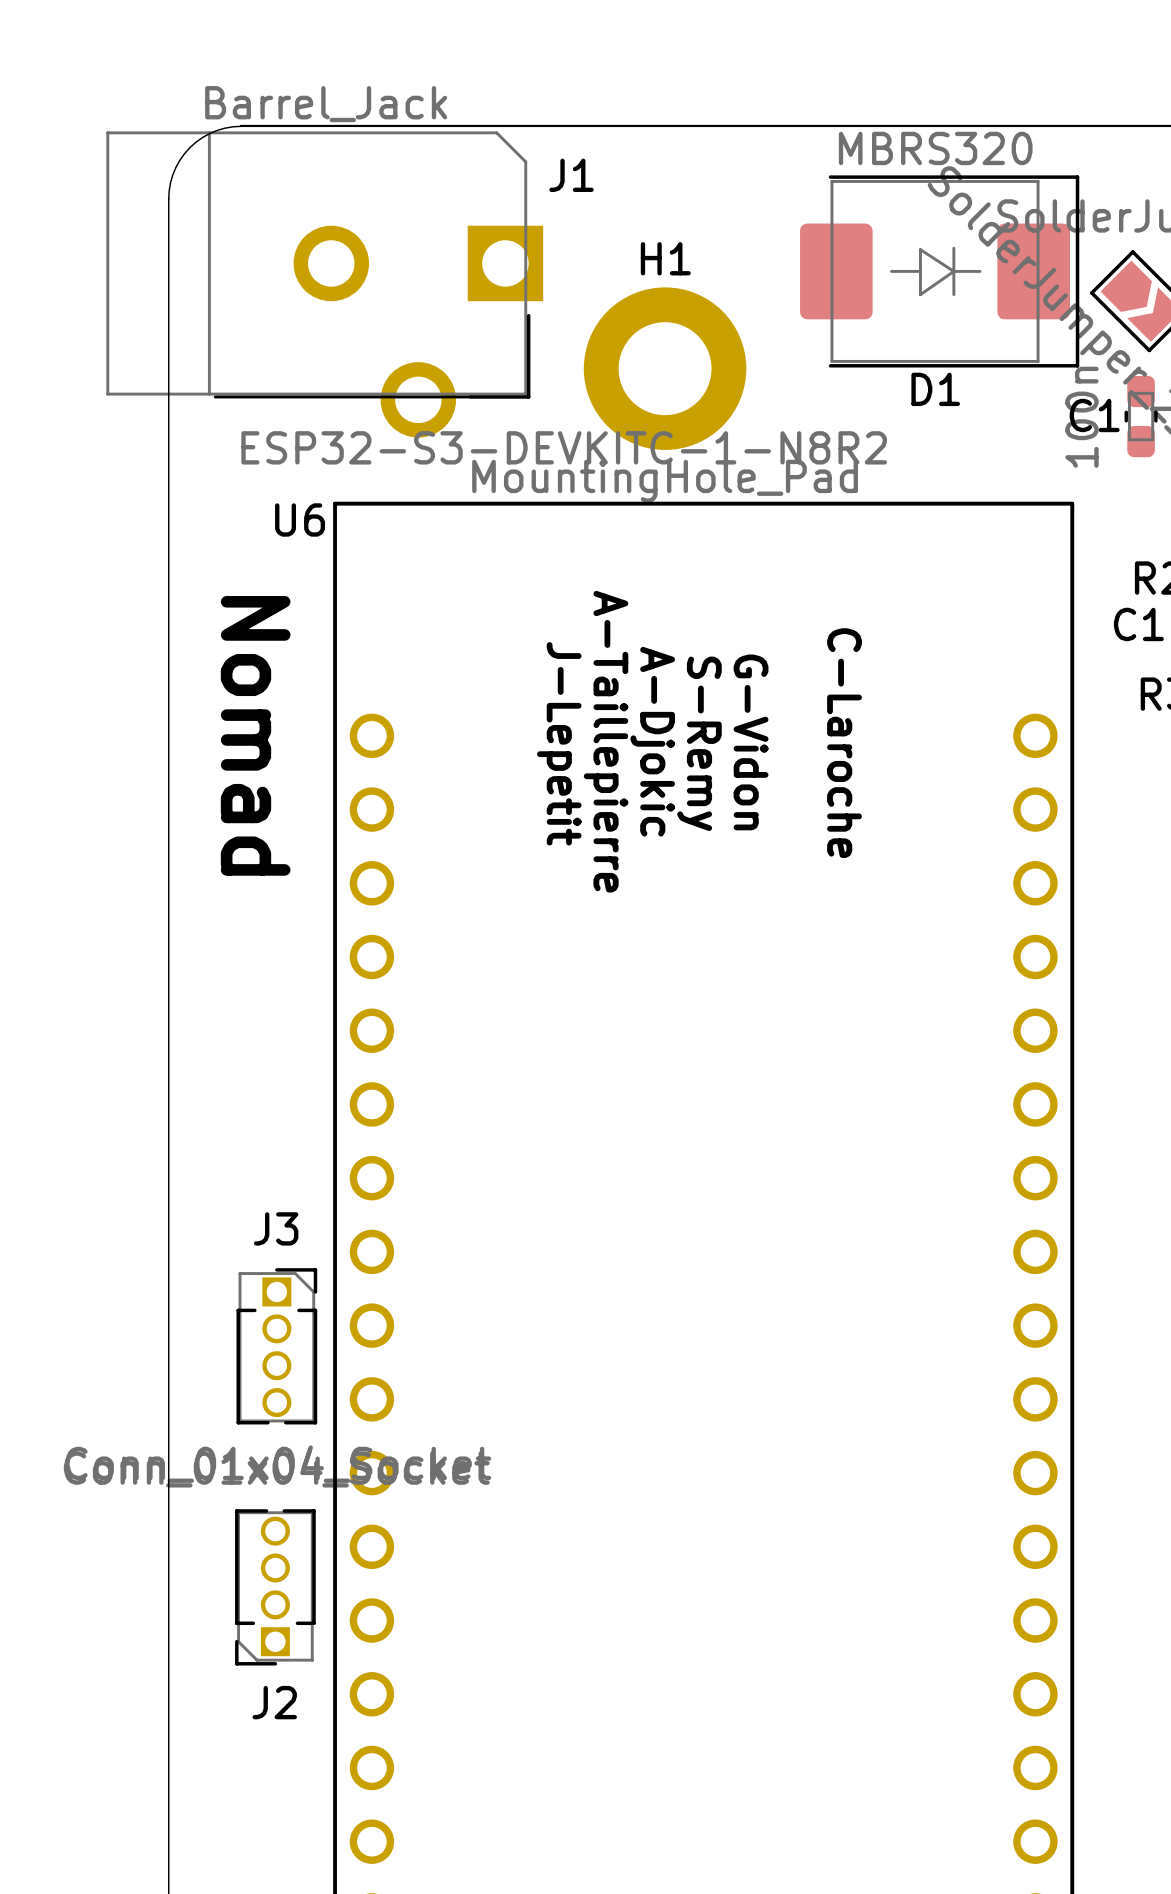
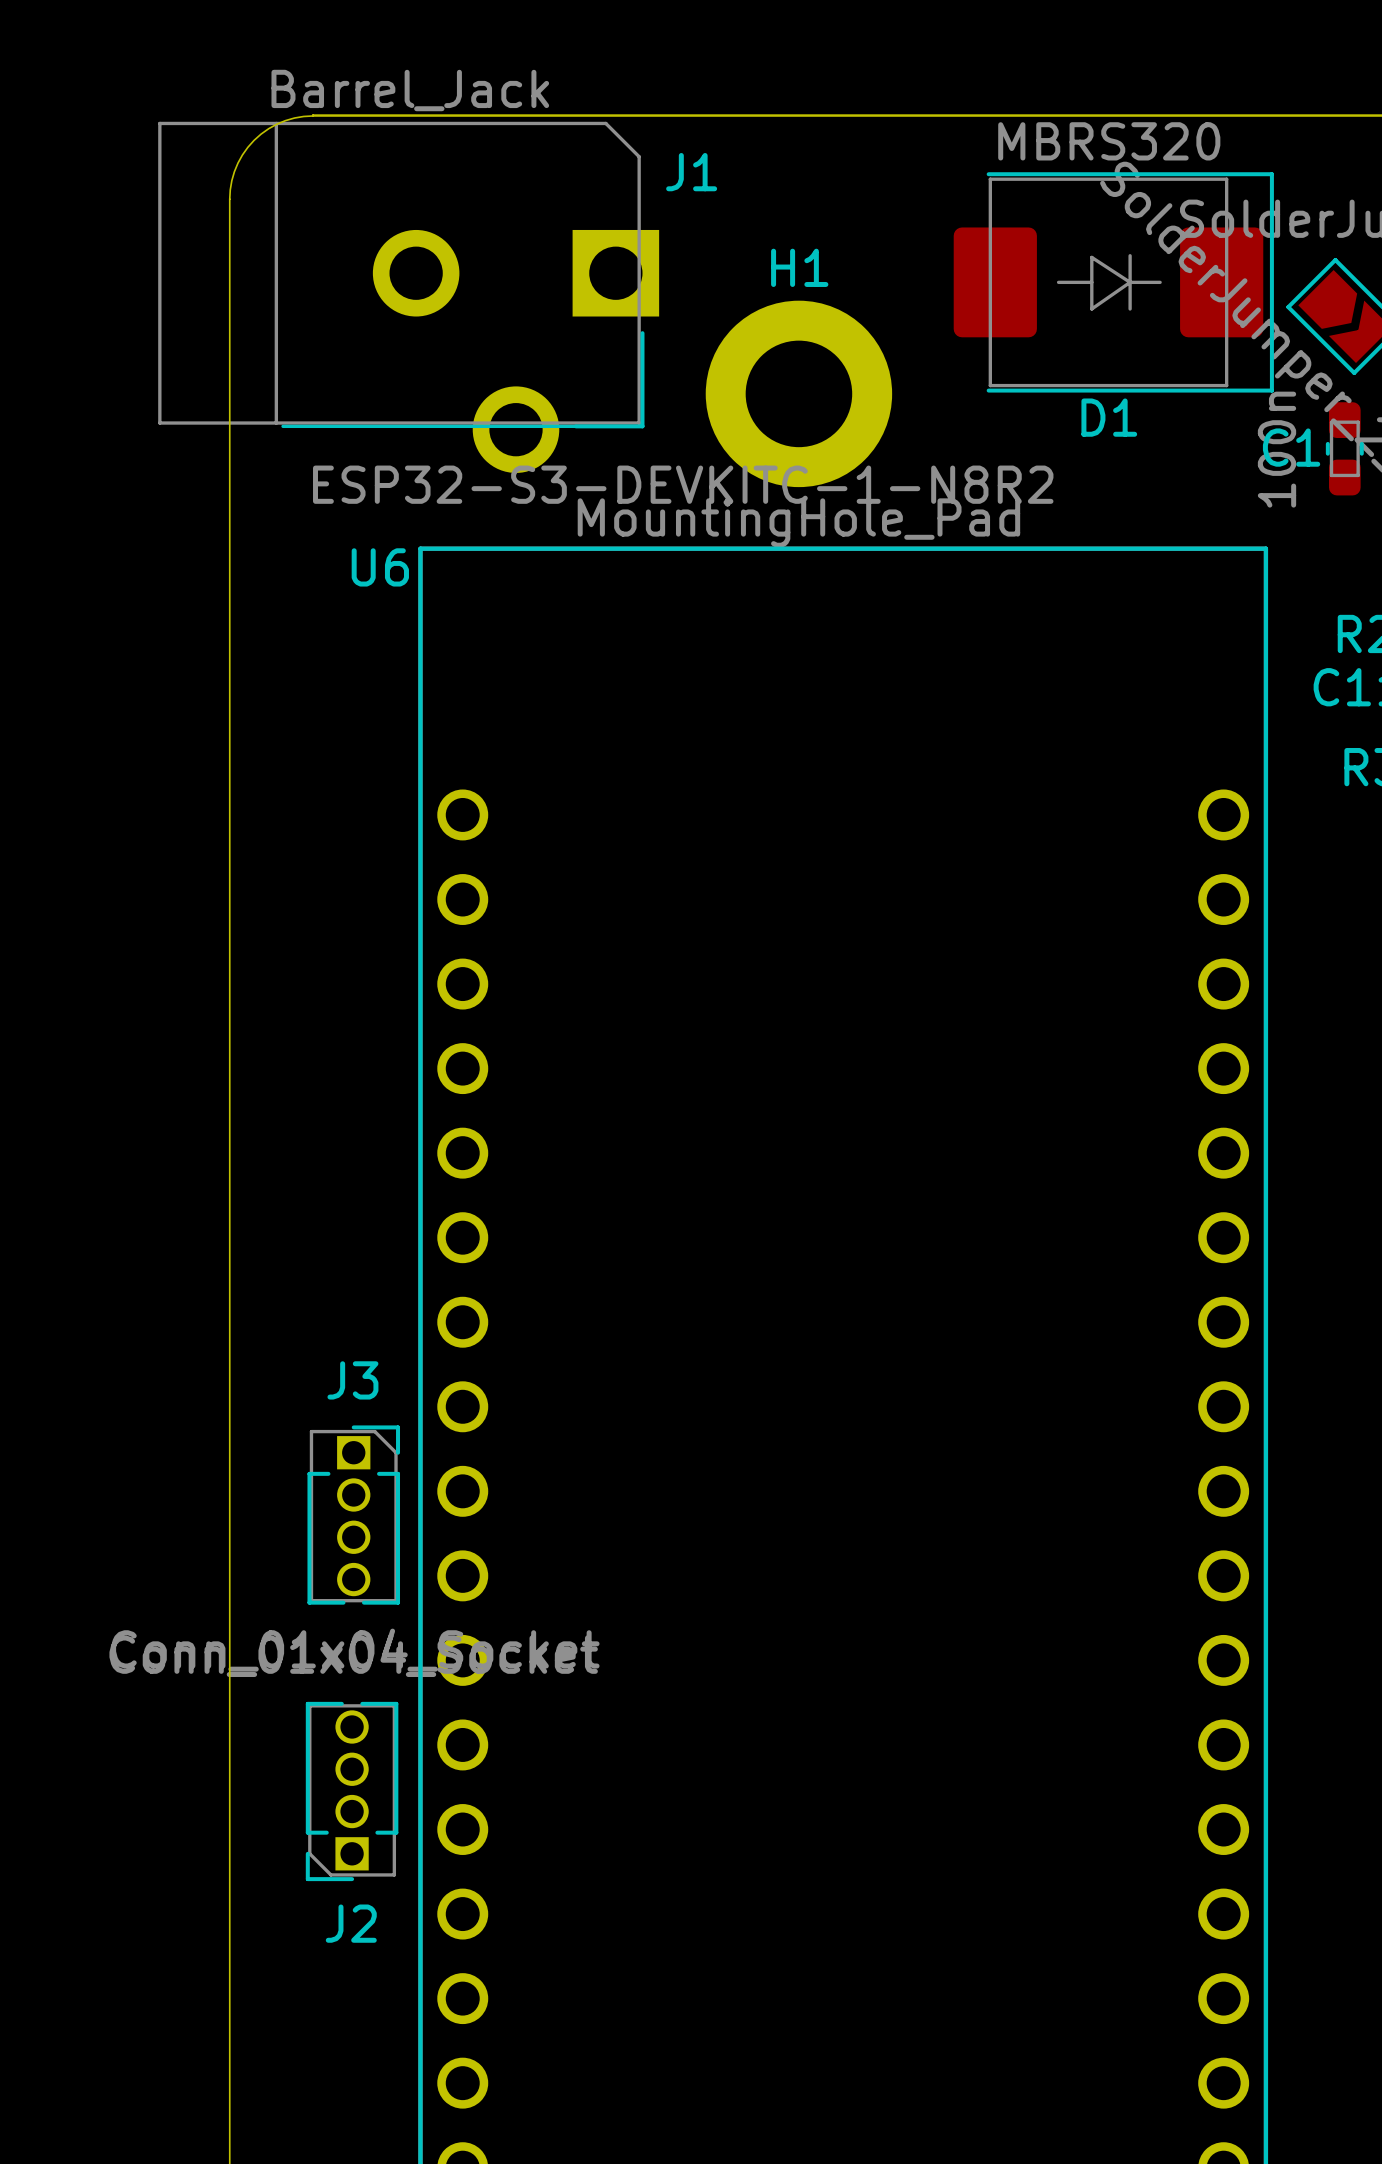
text: Nomad (255, 735) -> none
text: A-Taillepierre (606, 741) -> none
text: A-Djokic (652, 741) -> none
text: G-Vidon (751, 742) -> none
text: J-Lepetit (559, 743) -> none
text: S-Remy (699, 743) -> none
text: C-Laroche (844, 743) -> none

